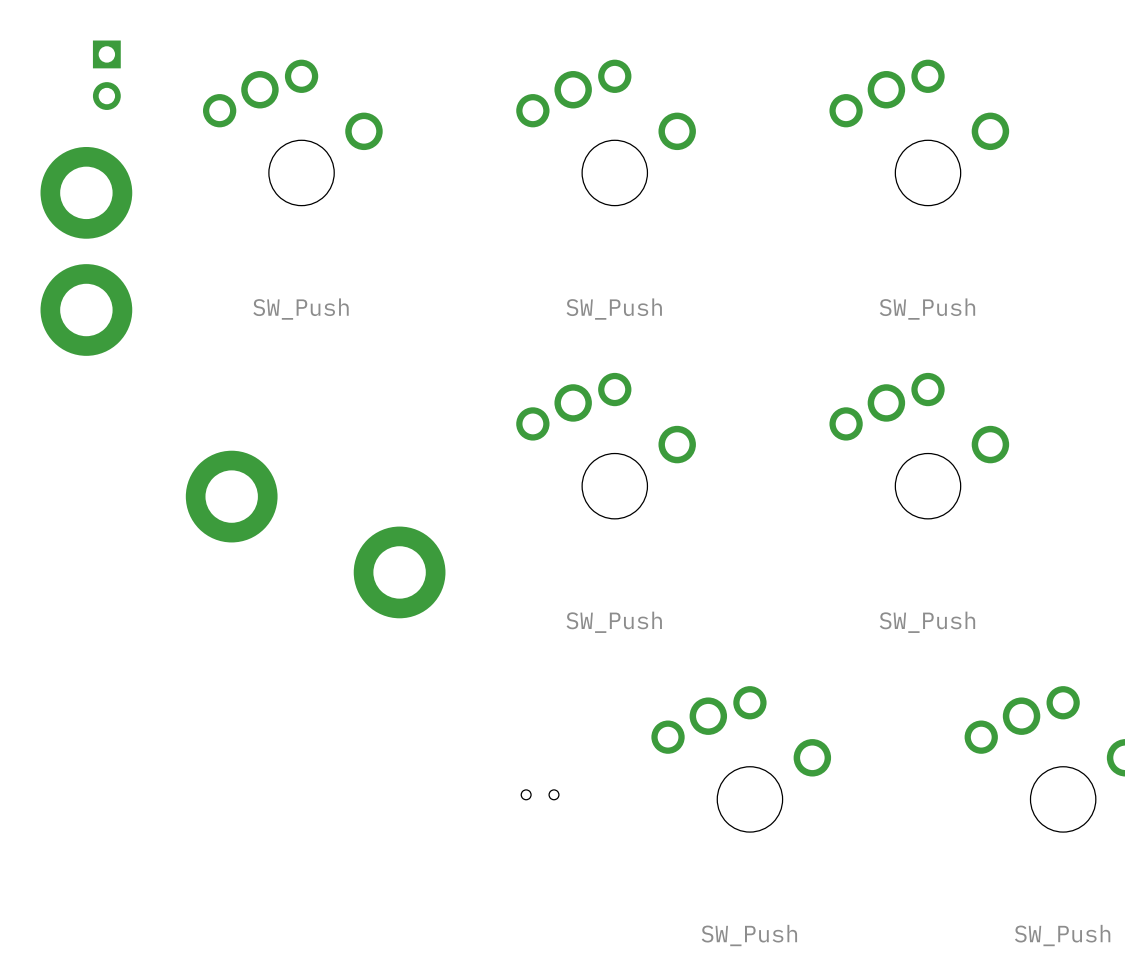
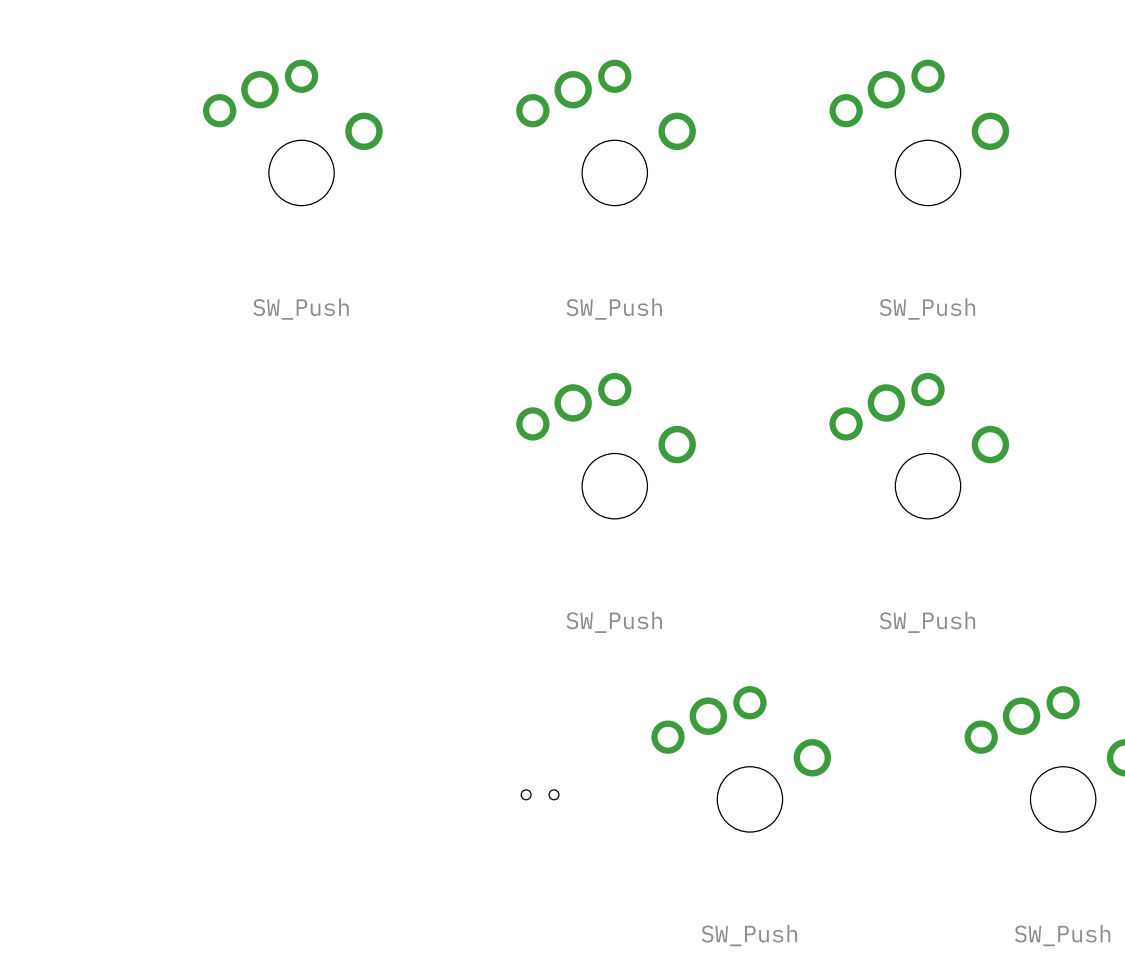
part: (106, 75) -> none
part: (86, 192) -> none
part: (86, 309) -> none
part: (231, 496) -> none
part: (399, 572) -> none

